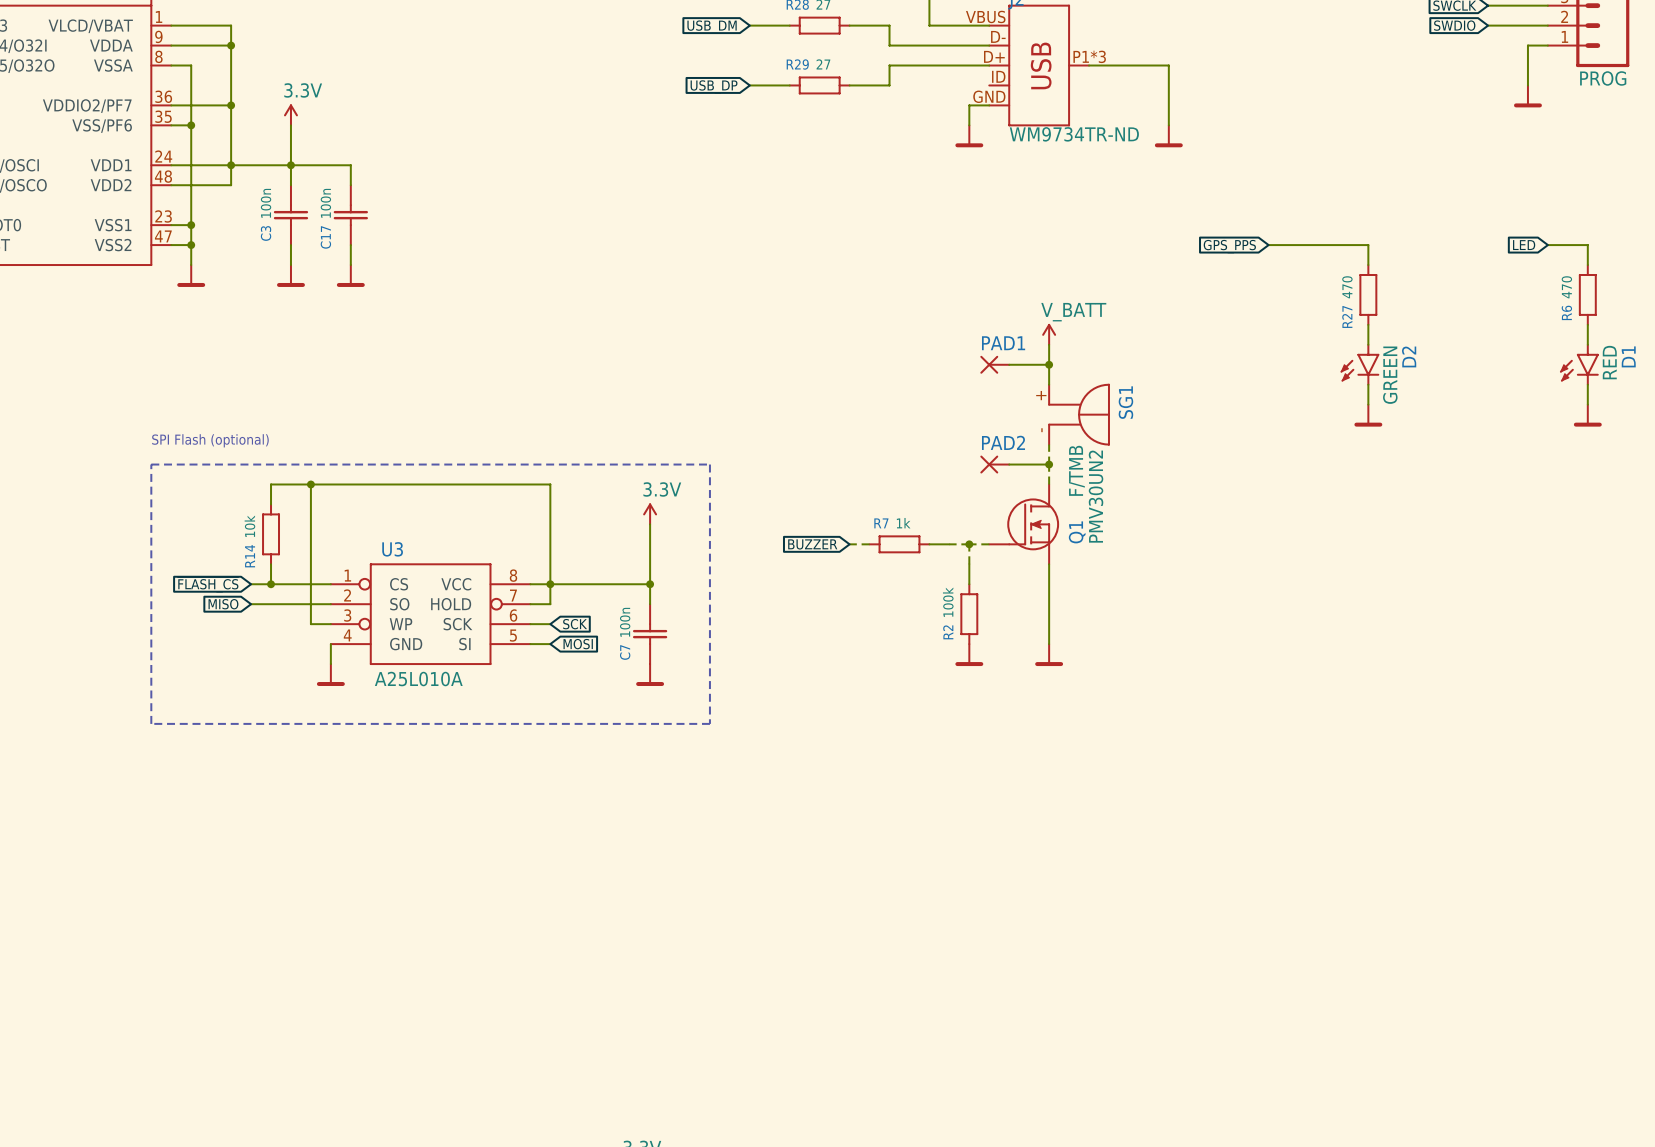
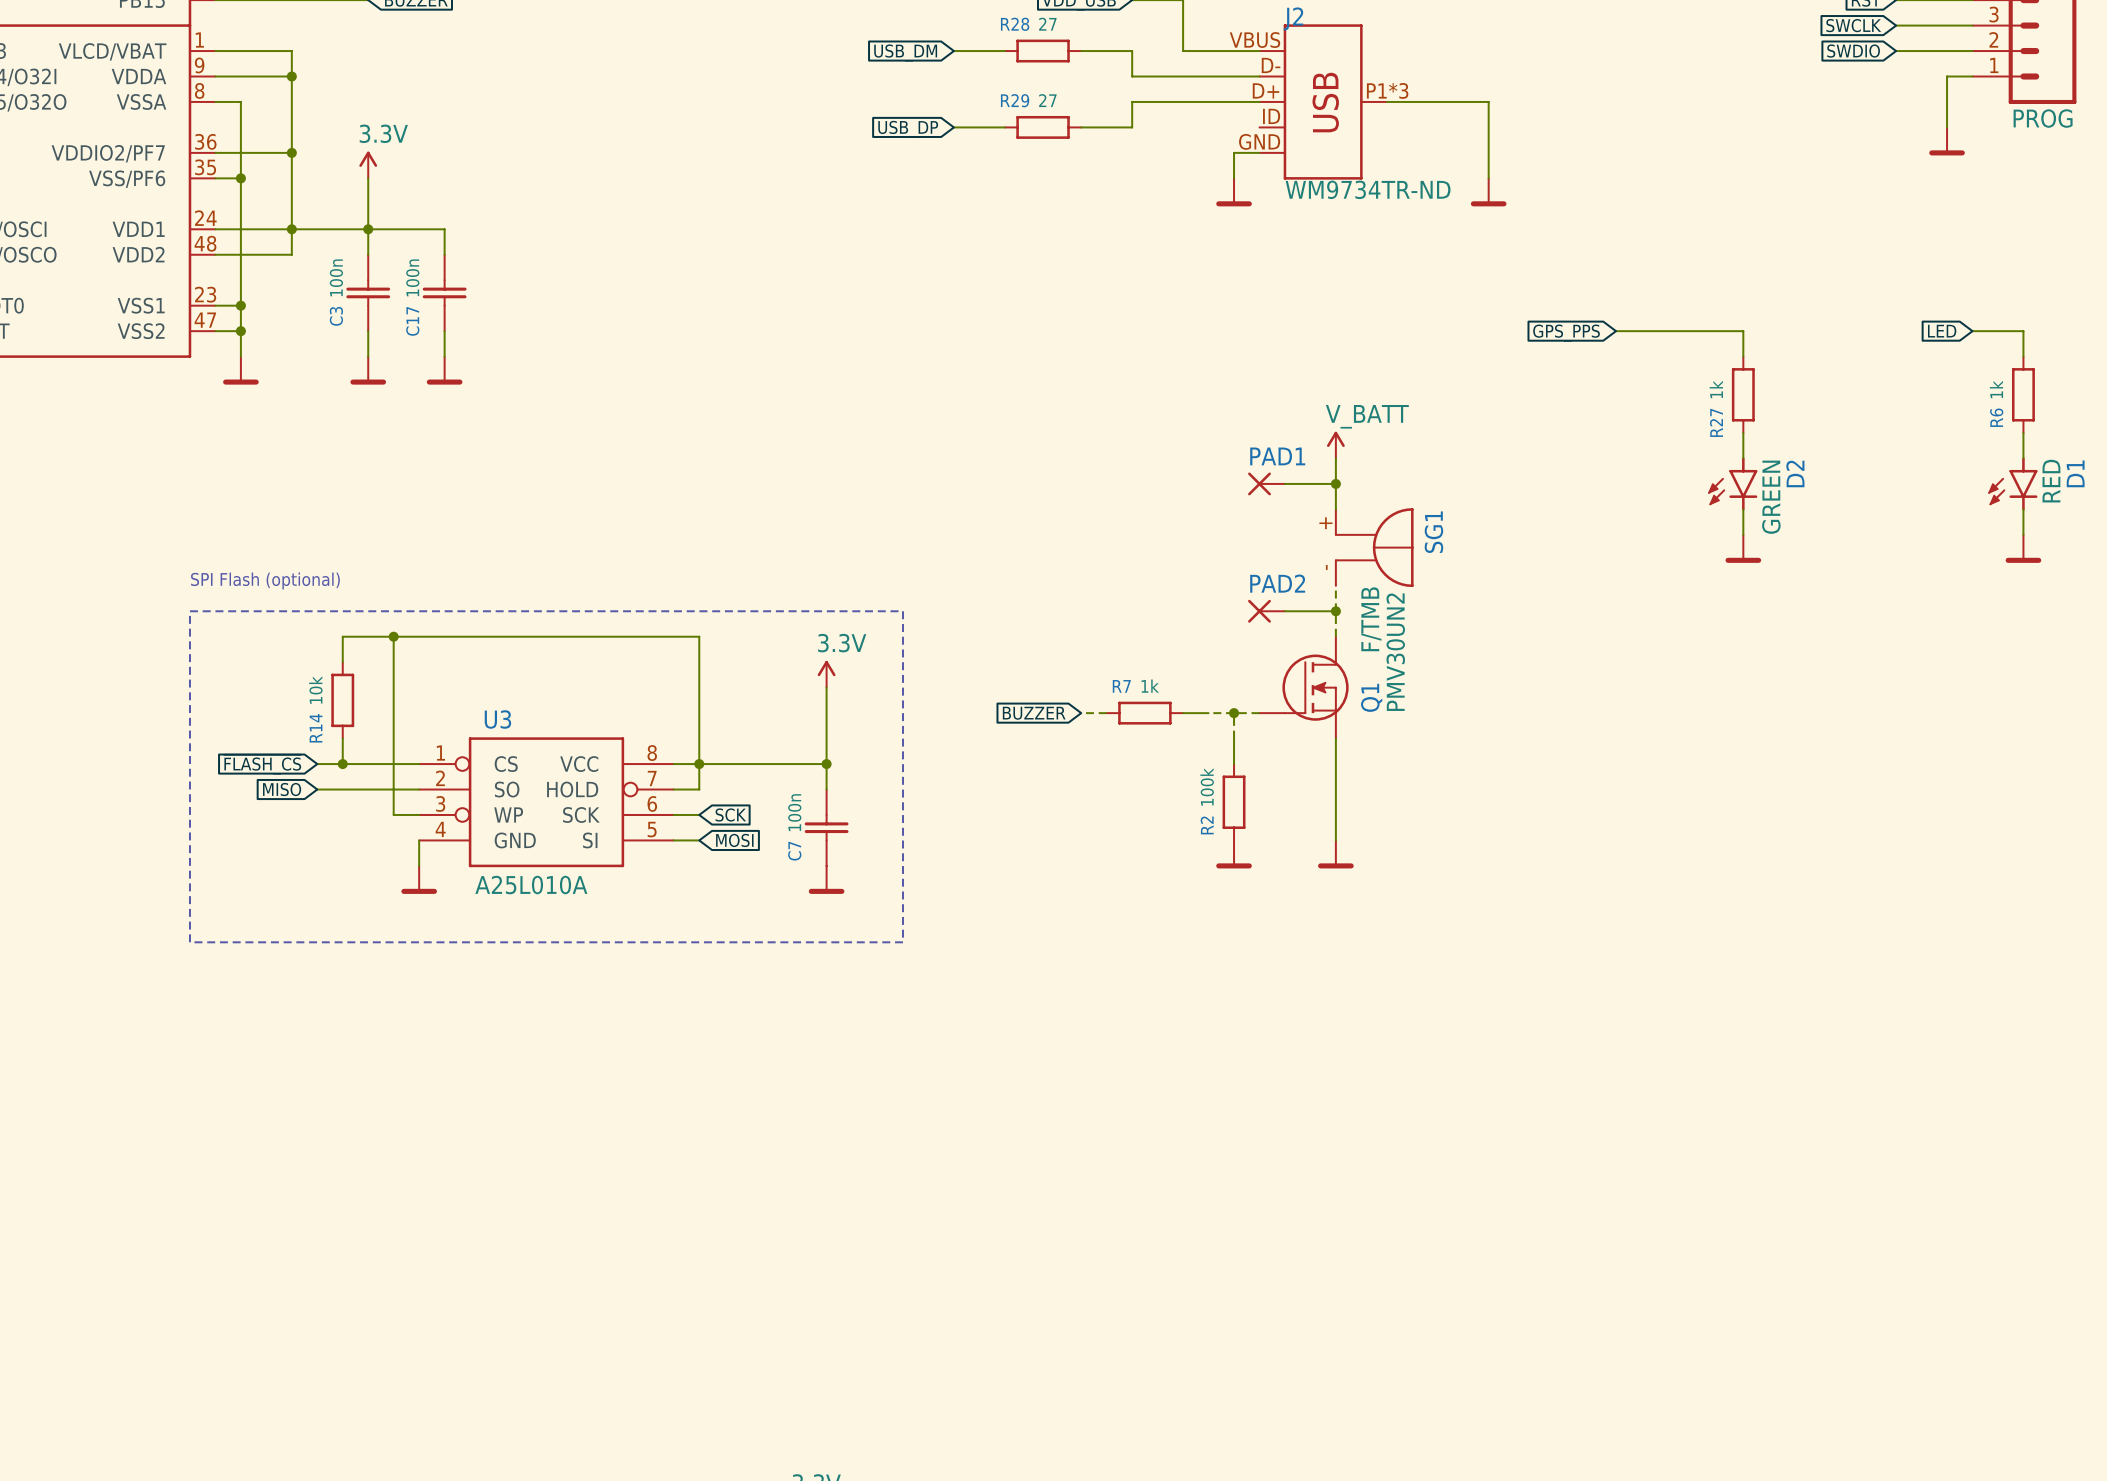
R27 value: 470 (1347, 287) -> 1k (1716, 389)
R6 value: 470 (1566, 287) -> 1k (1996, 389)

